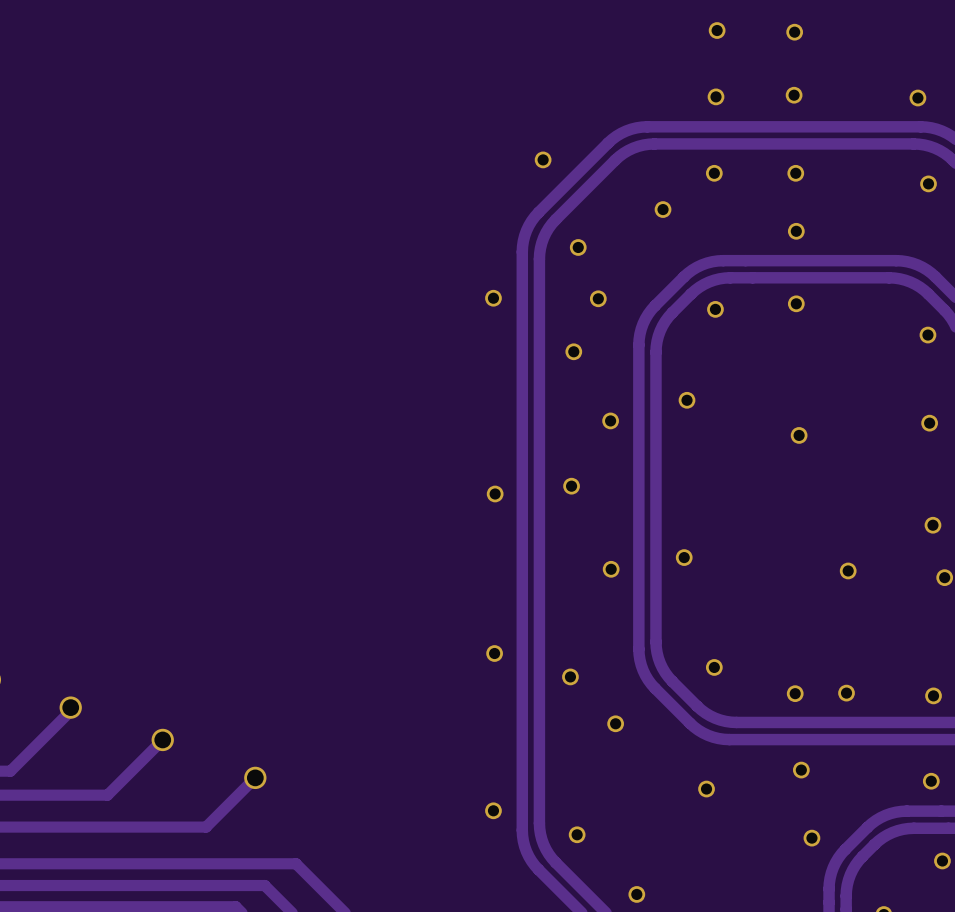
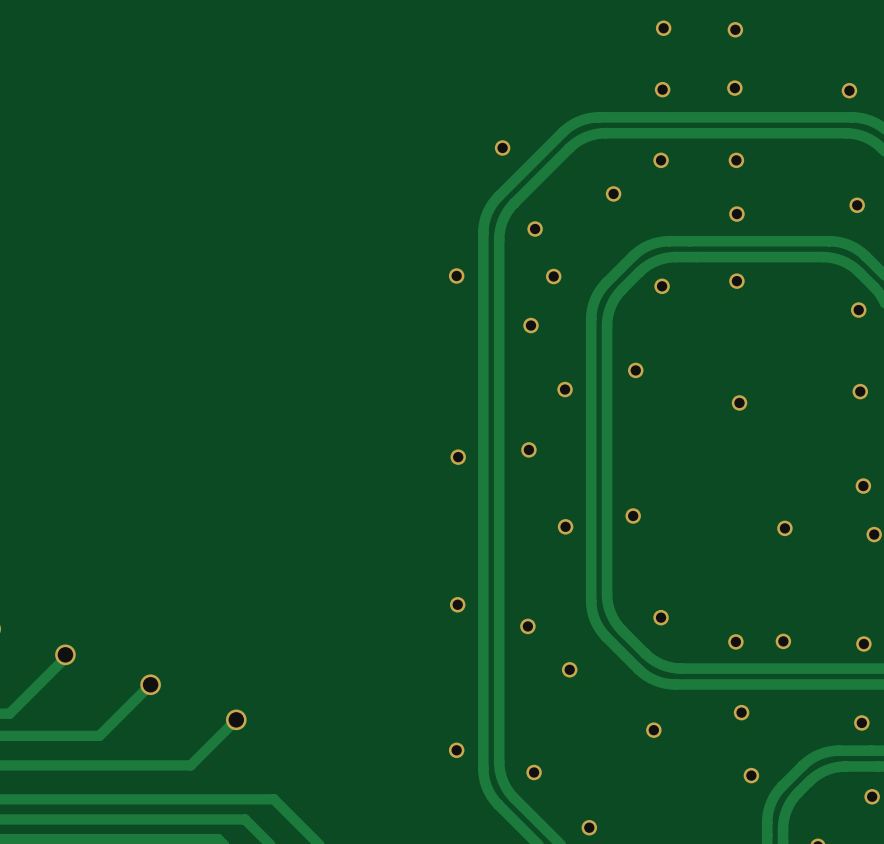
via position: (928, 183) -> (857, 205)

